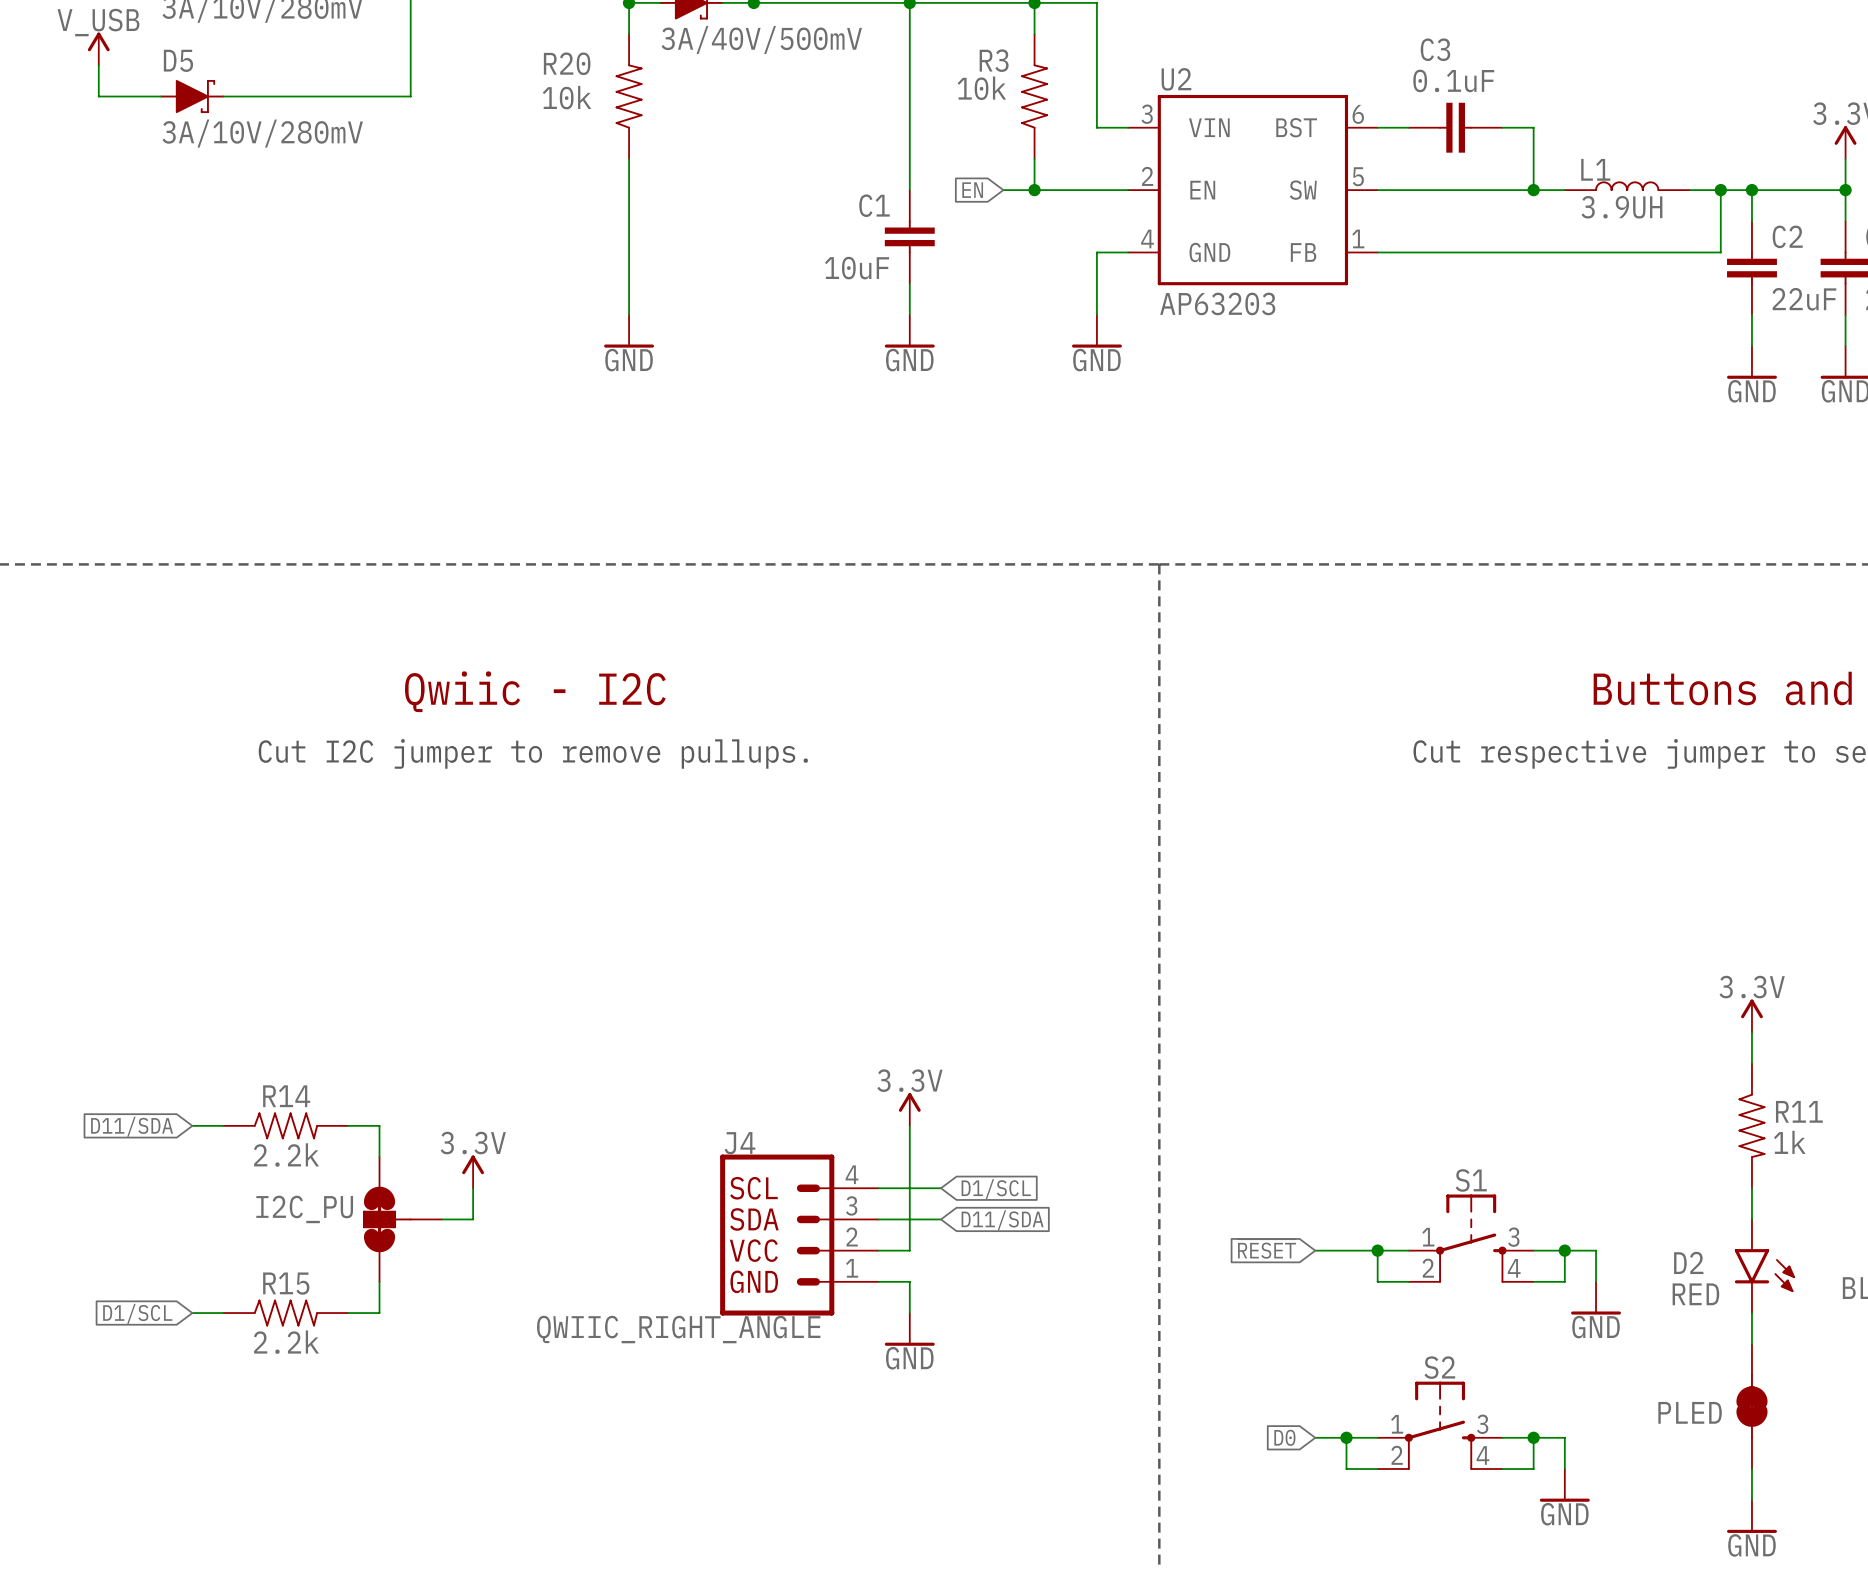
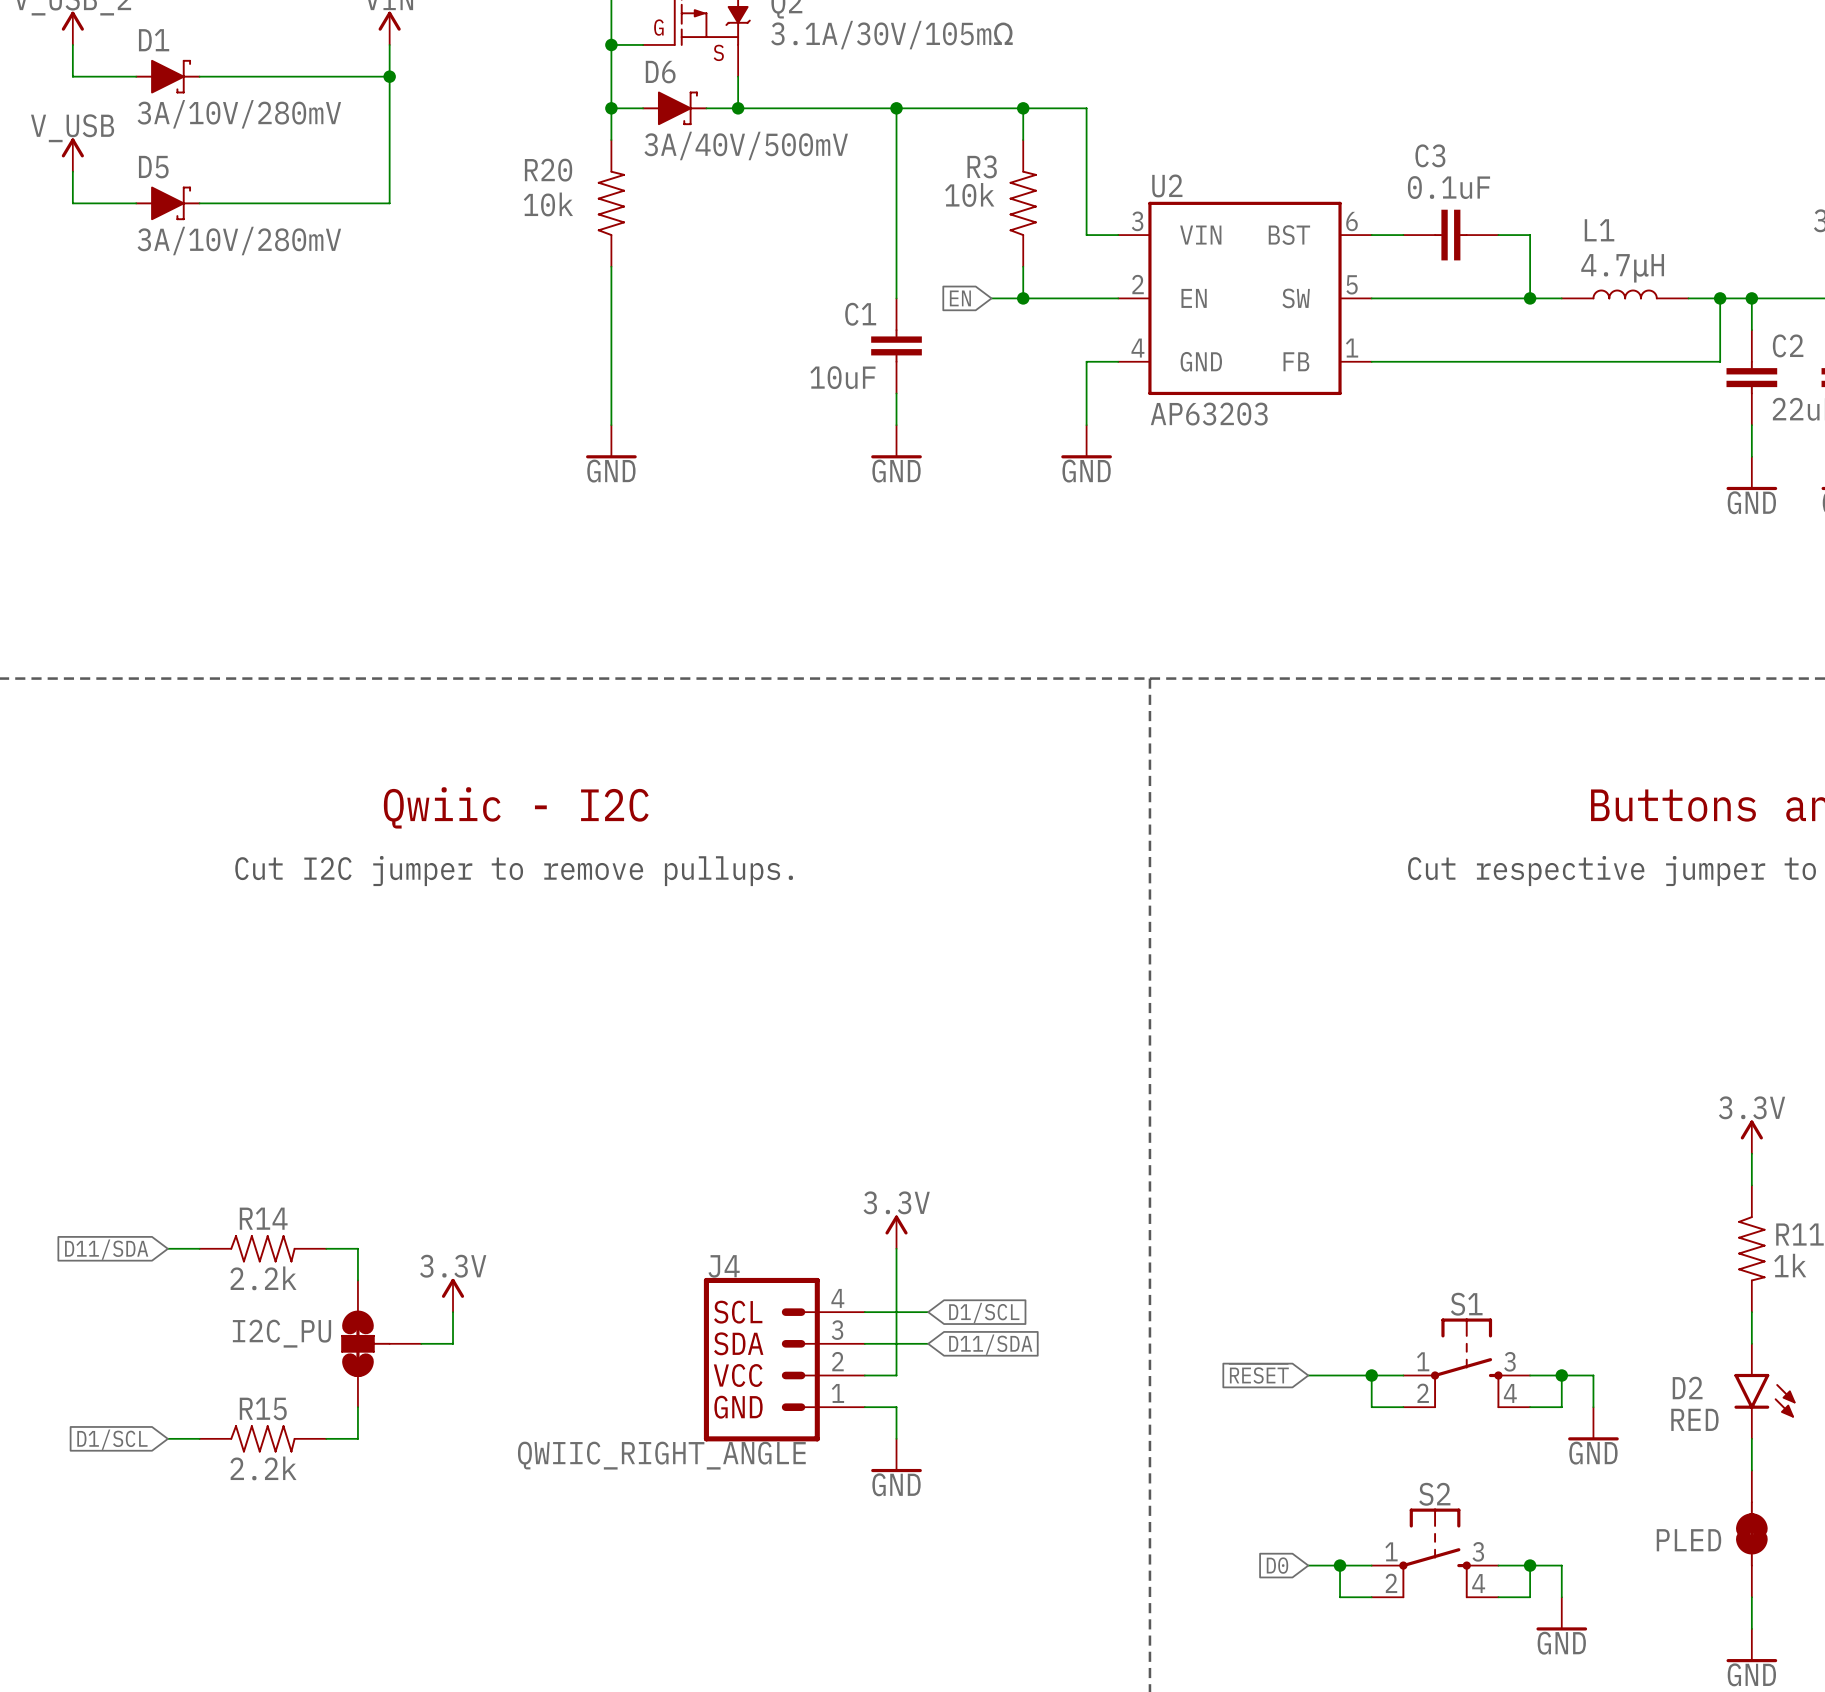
L1 name position: L1 (1595, 169) -> L1 (1599, 230)
L1 value: 3.9UH (1621, 207) -> 4.7μH (1622, 268)

